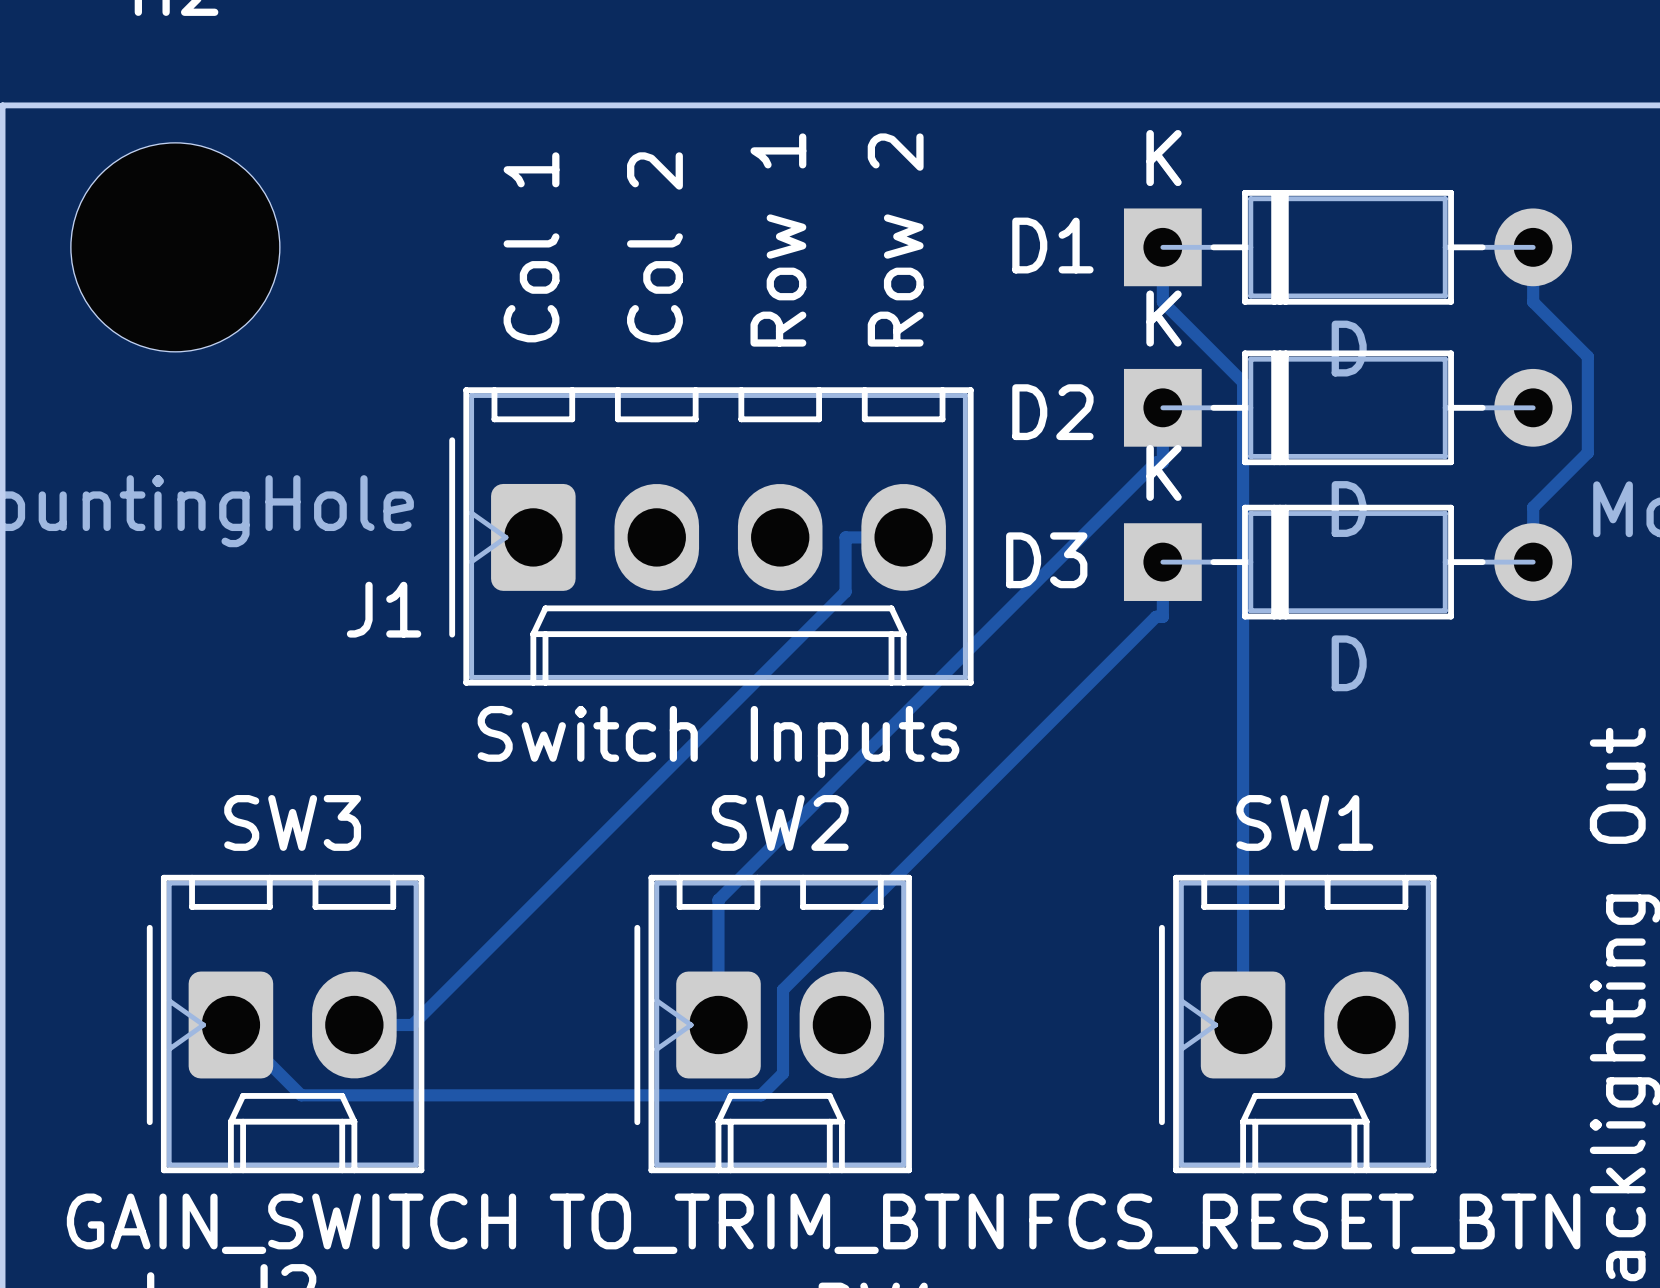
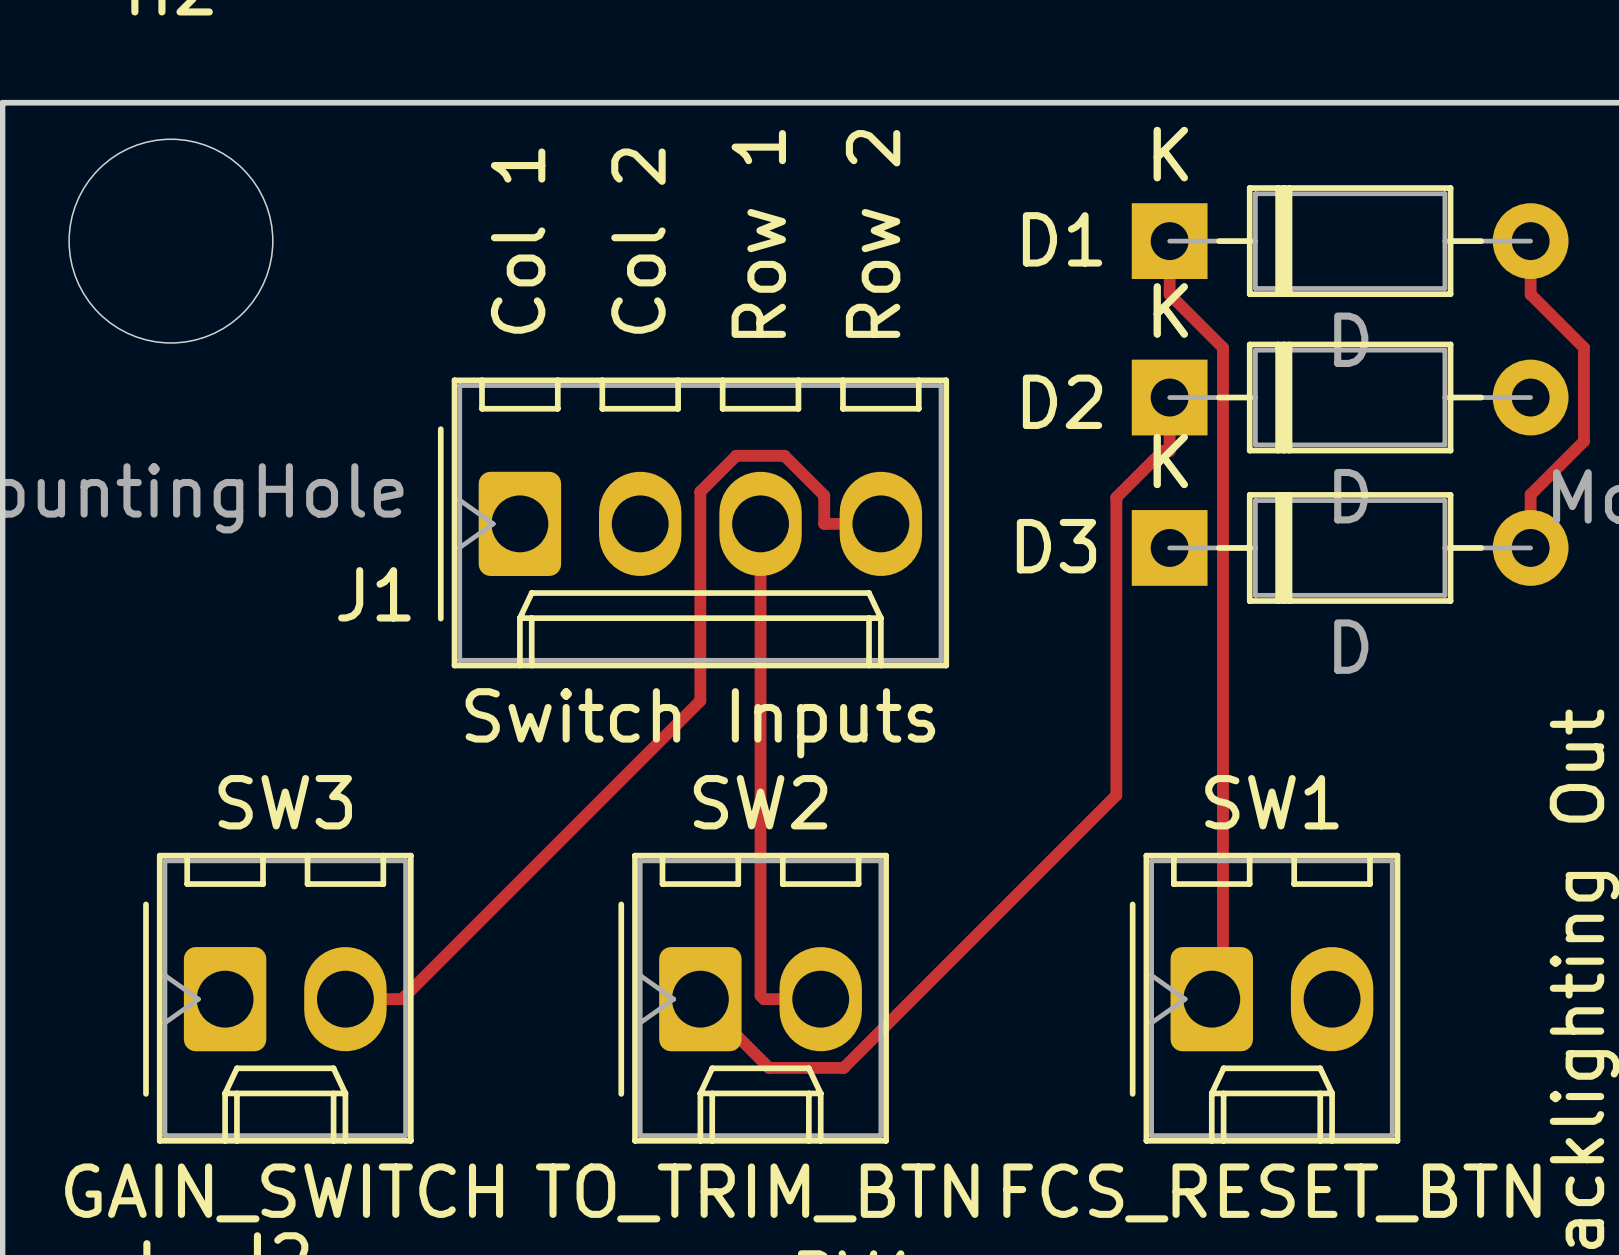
track: (1162, 247) (1162, 302) (1243, 382) (1243, 1024) -> (1169, 241) (1169, 294) (1222, 347) (1222, 987) (1211, 999)
D1 position: (1348, 247) -> (1350, 241)
track: (1533, 247) (1533, 302) (1587, 356) (1587, 452) (1533, 507) (1533, 562) -> (1530, 241) (1530, 294) (1583, 347) (1583, 441) (1530, 494) (1530, 547)
track: (1162, 407) (1162, 462) (1156, 462) (718, 900) (718, 1024) -> (1169, 397) (1169, 450) (1162, 450) (1116, 497) (1116, 795) (843, 1067) (769, 1067) (700, 999)
D2 position: (1348, 407) -> (1350, 397)
track: none -> (760, 523) (760, 995) (764, 999) (820, 999)
track: (845, 537) (845, 591) (718, 718) -> (824, 523) (824, 495) (784, 455) (736, 455) (700, 491) (700, 700)
track: (1162, 562) (1162, 616) (1156, 616) (783, 989) (783, 1073) (761, 1095) (301, 1095) (230, 1024) -> none
D3 position: (1348, 562) -> (1350, 547)

